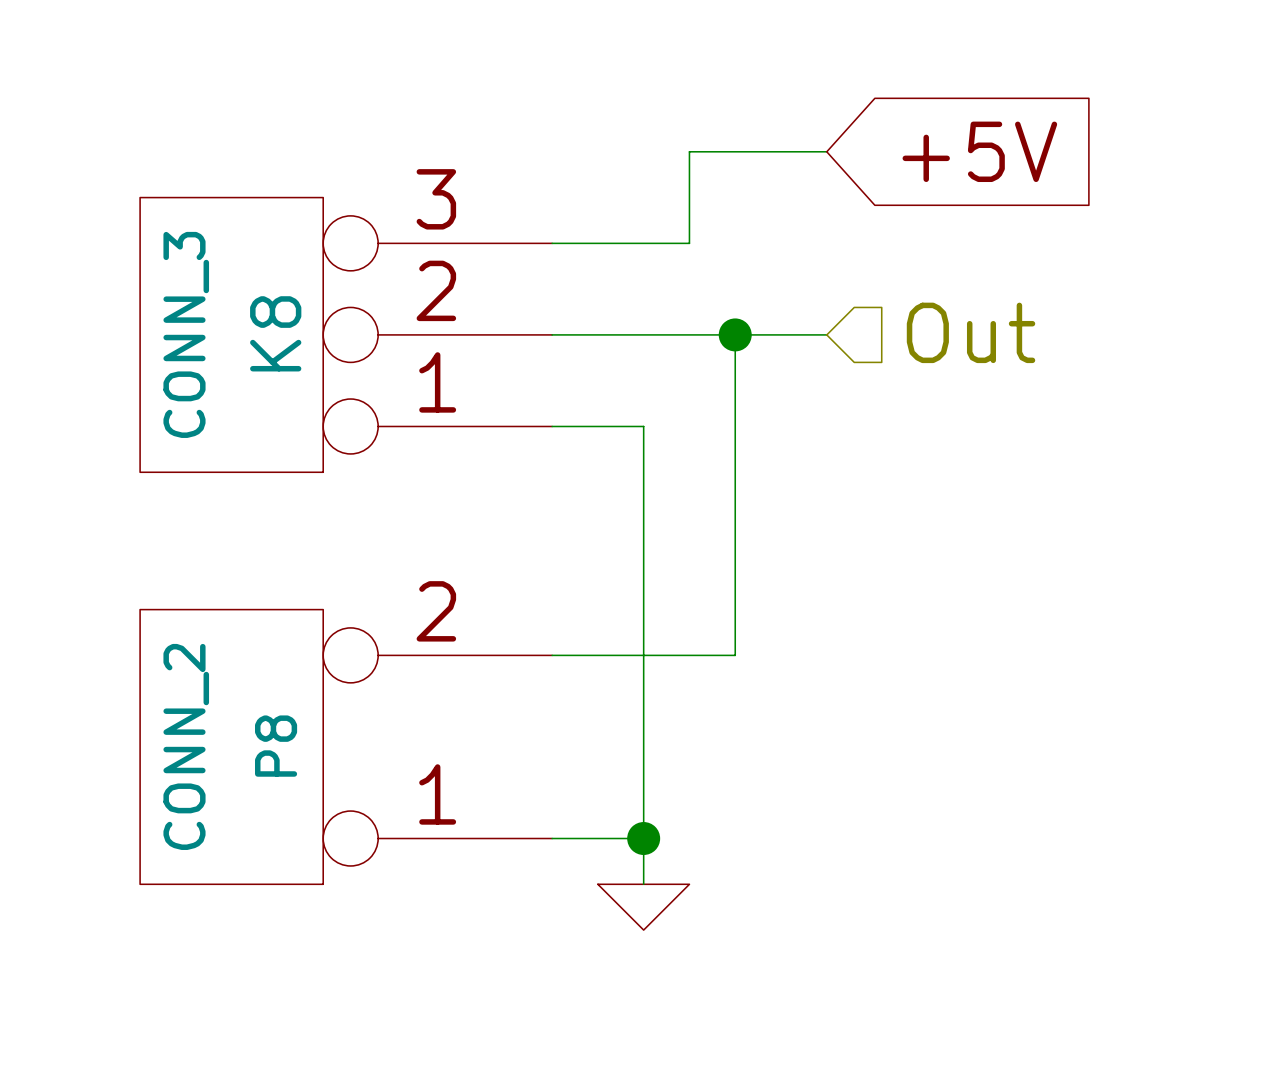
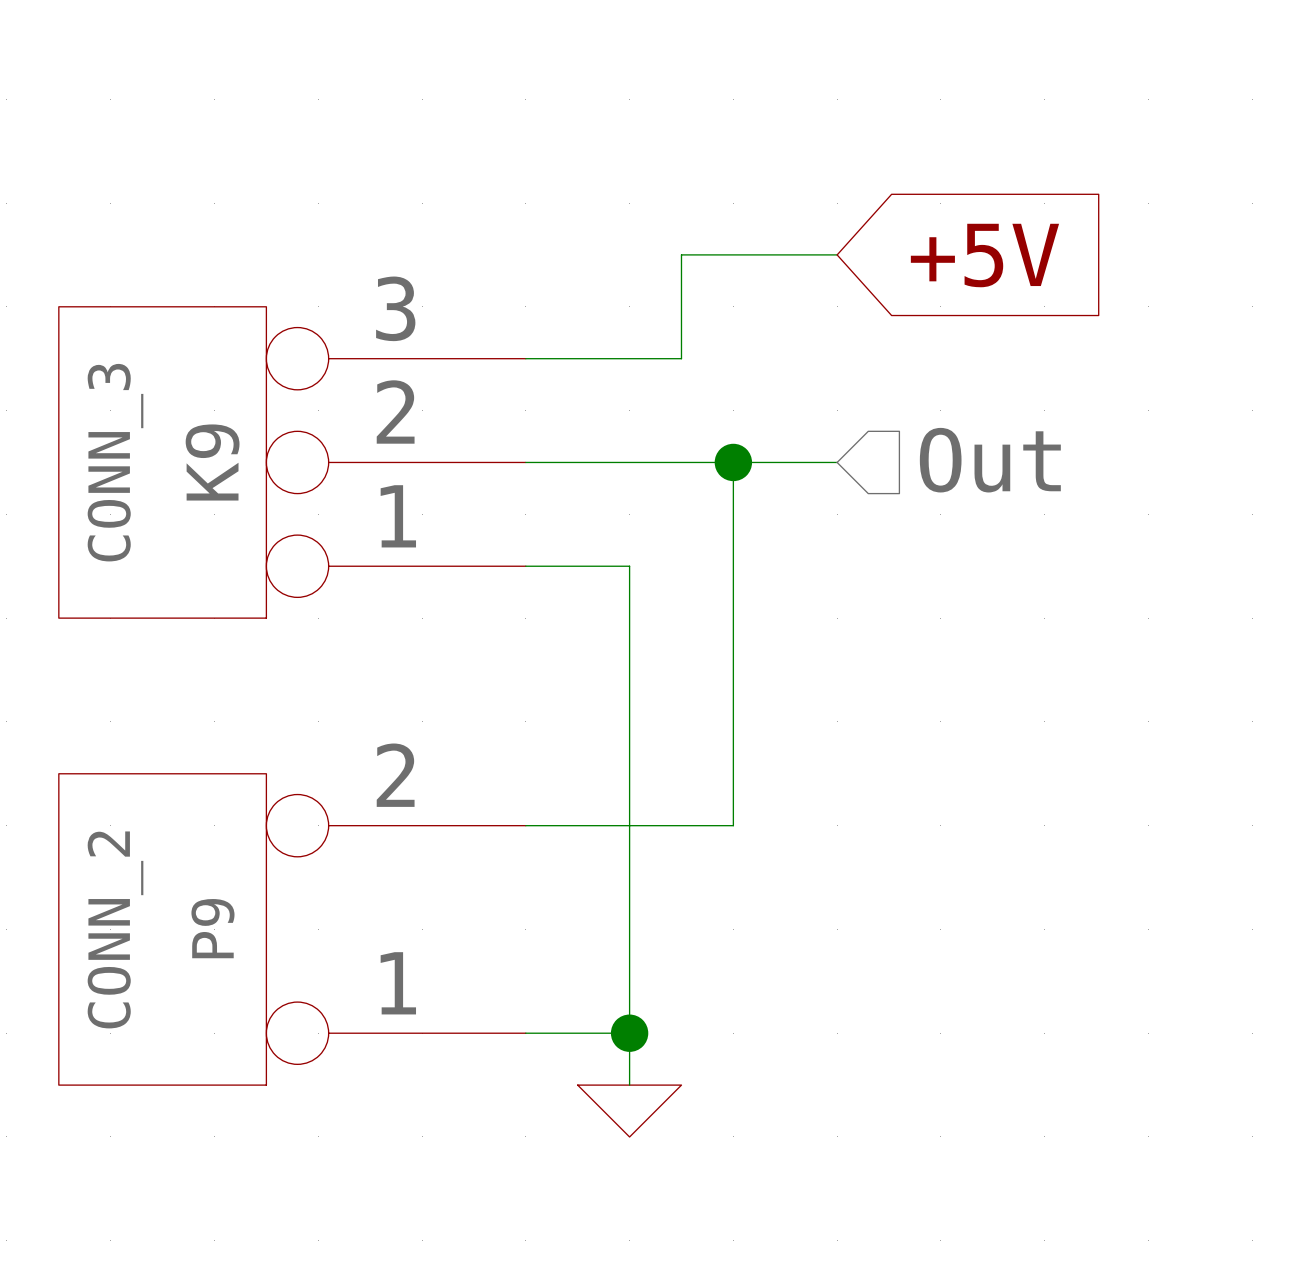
K8 name: K8 (275, 333) -> K9 (212, 462)
P8 name: P8 (276, 746) -> P9 (212, 928)

